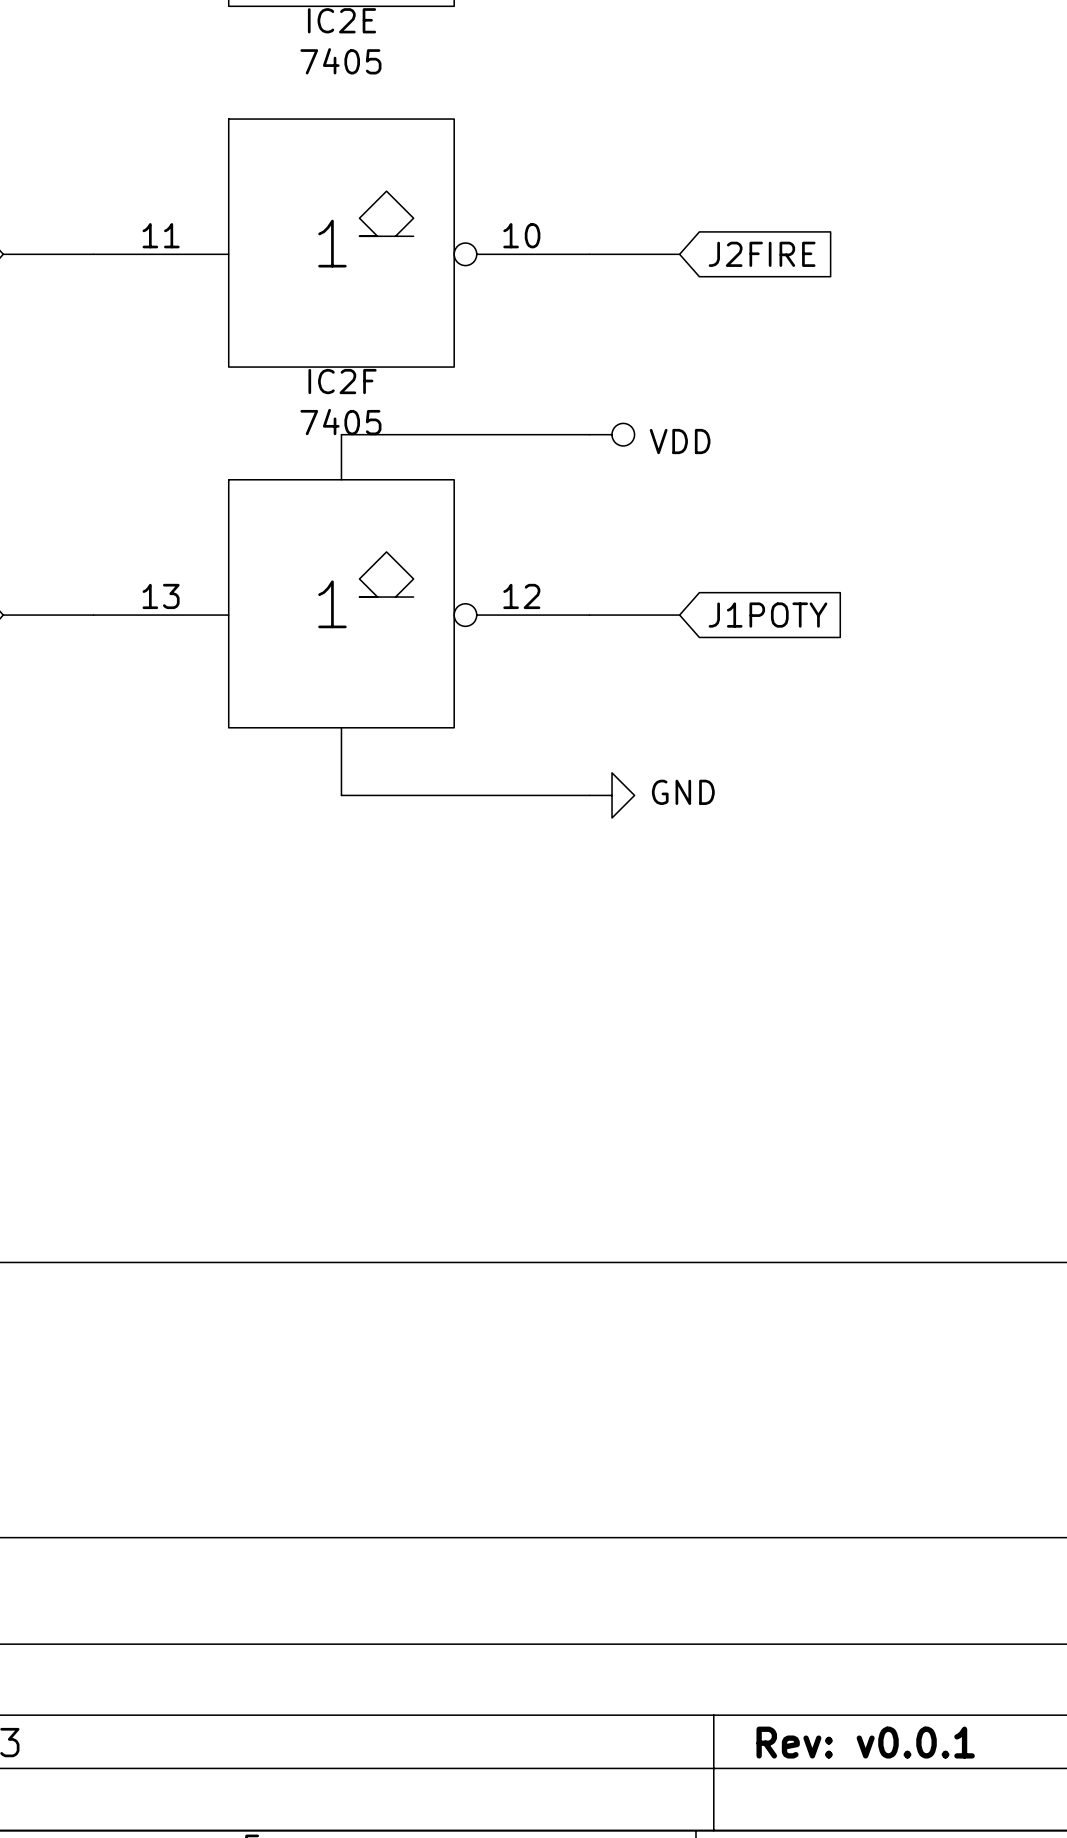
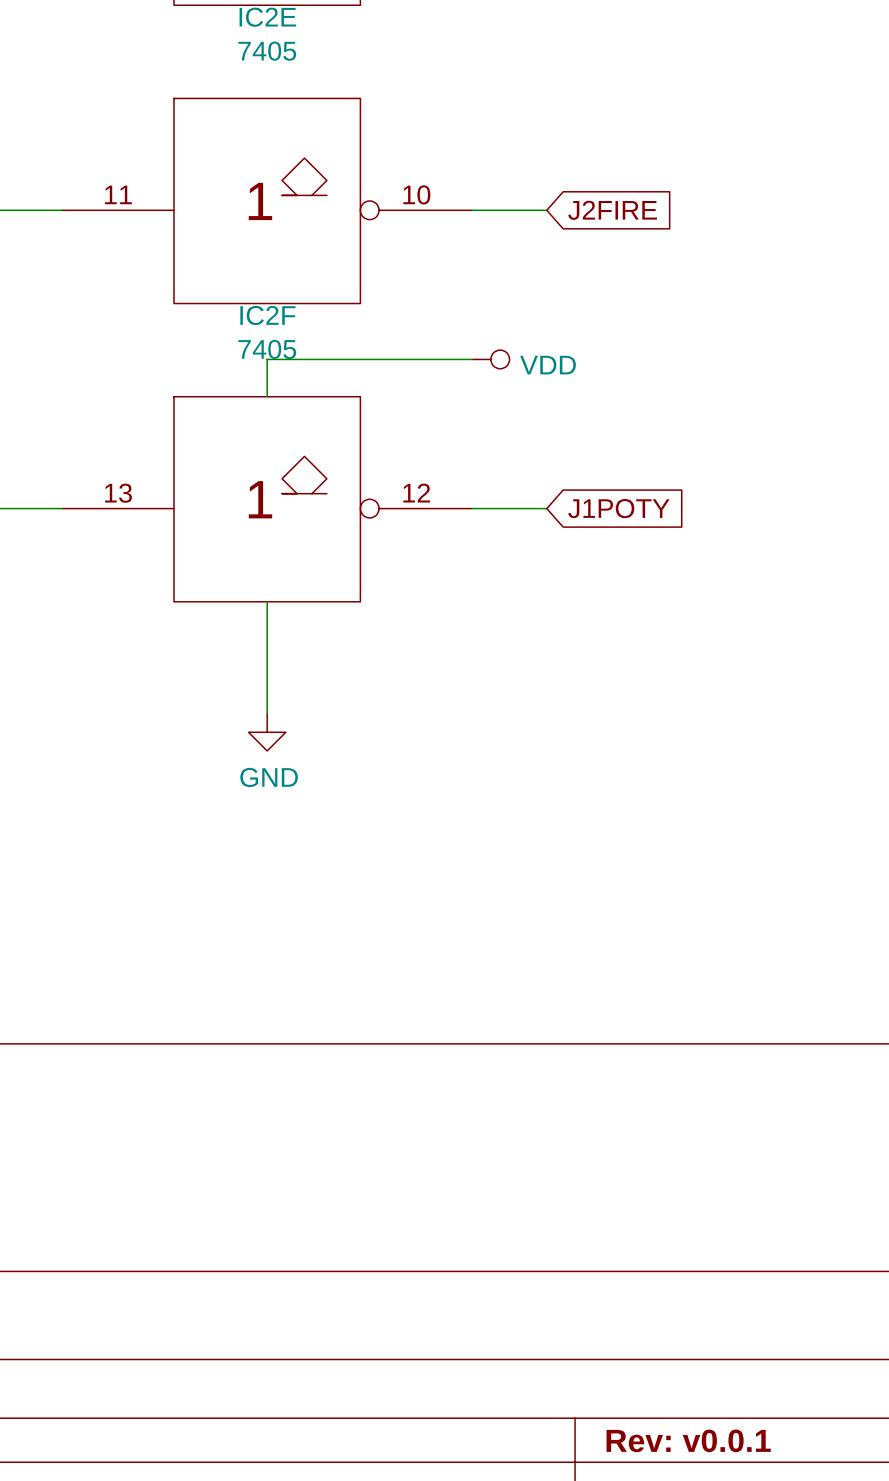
wire: (341, 795) (589, 795) -> (267, 657) (267, 713)
power symbol rotation: 0° (612, 795) -> 90° clockwise (267, 732)
power symbol position: GND (612, 795) -> GND (267, 732)

